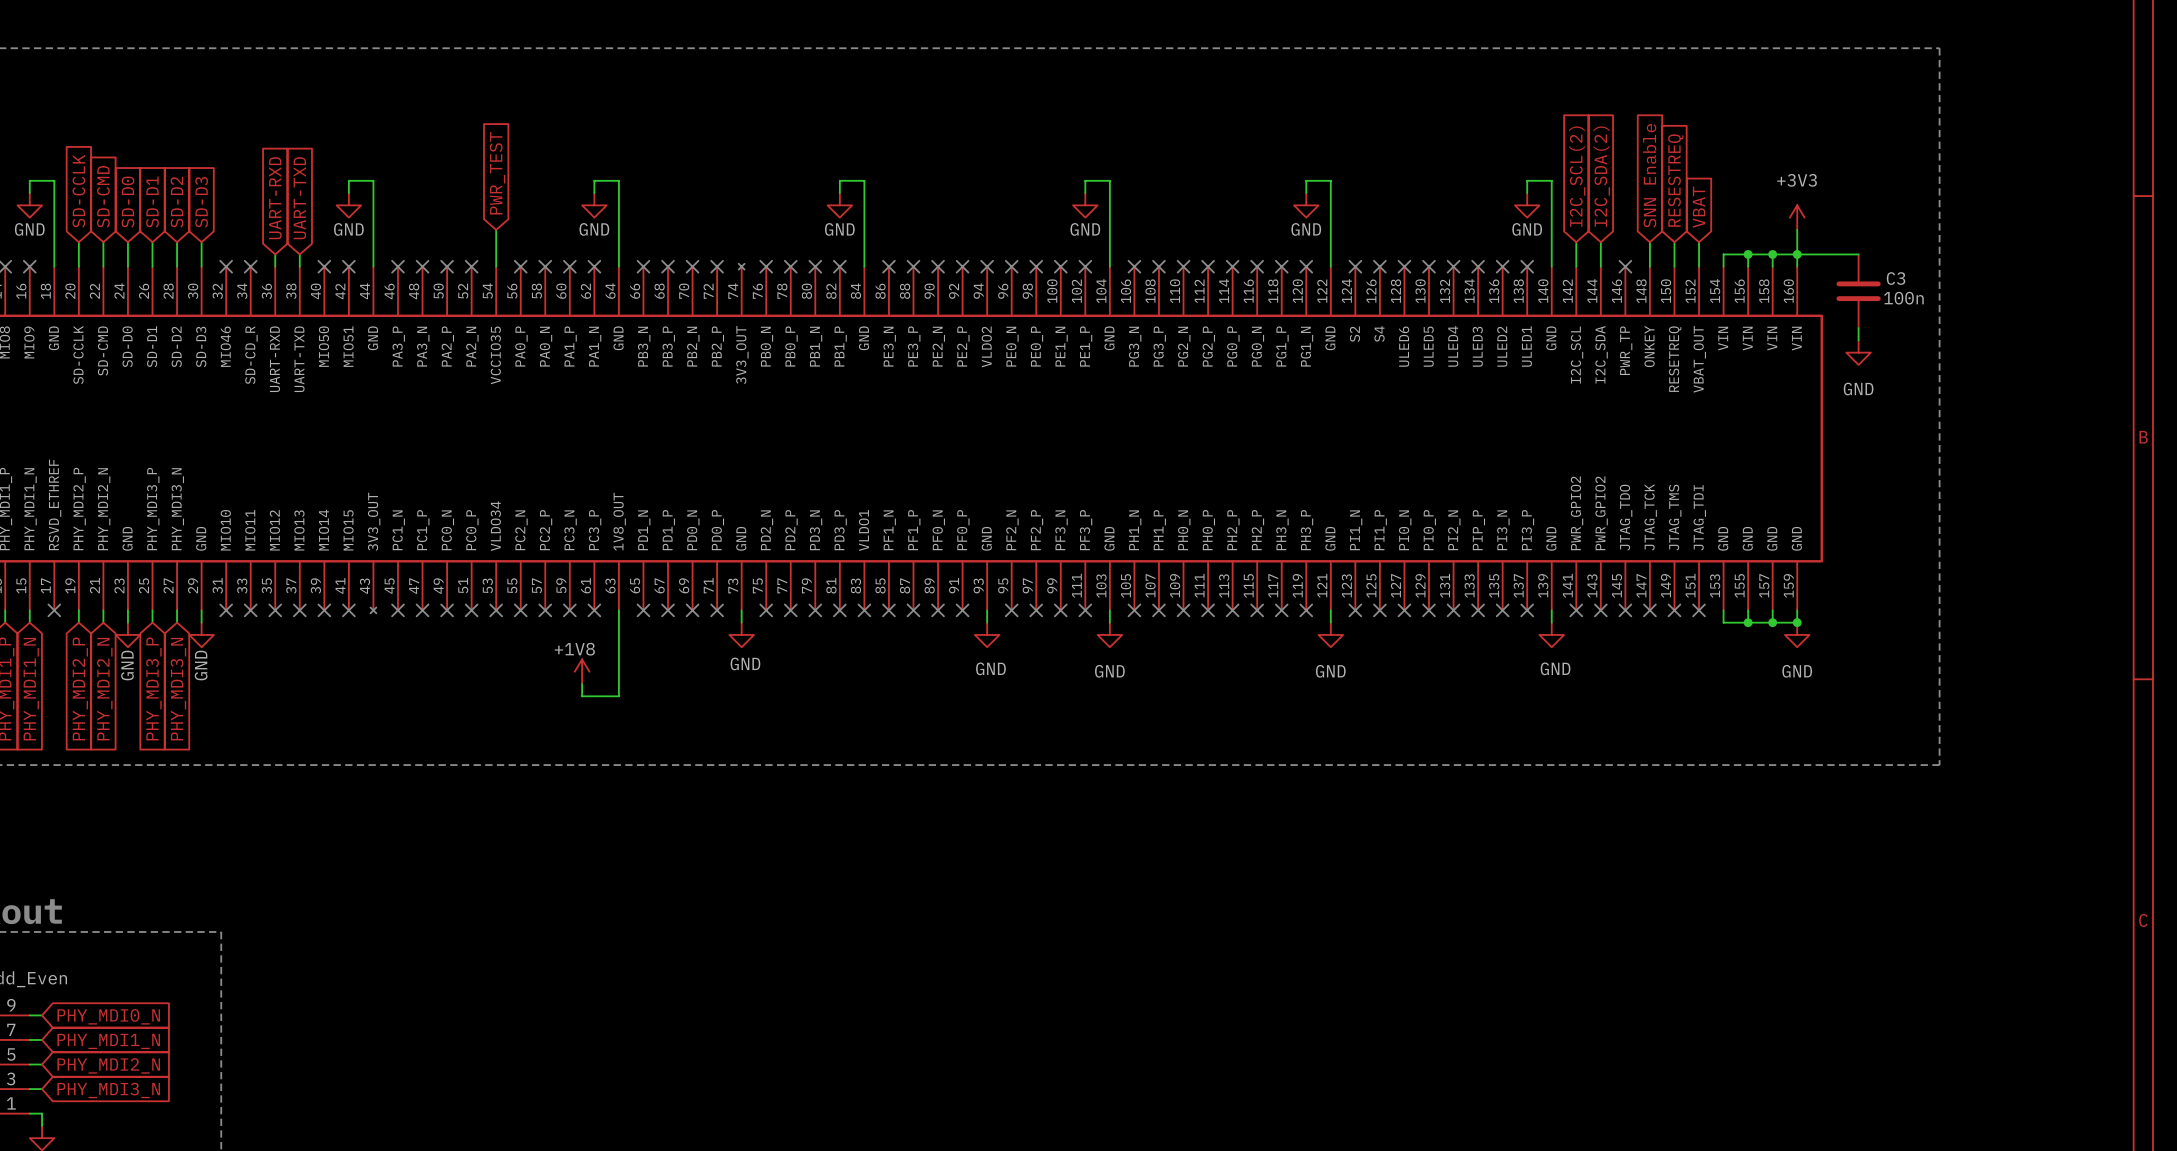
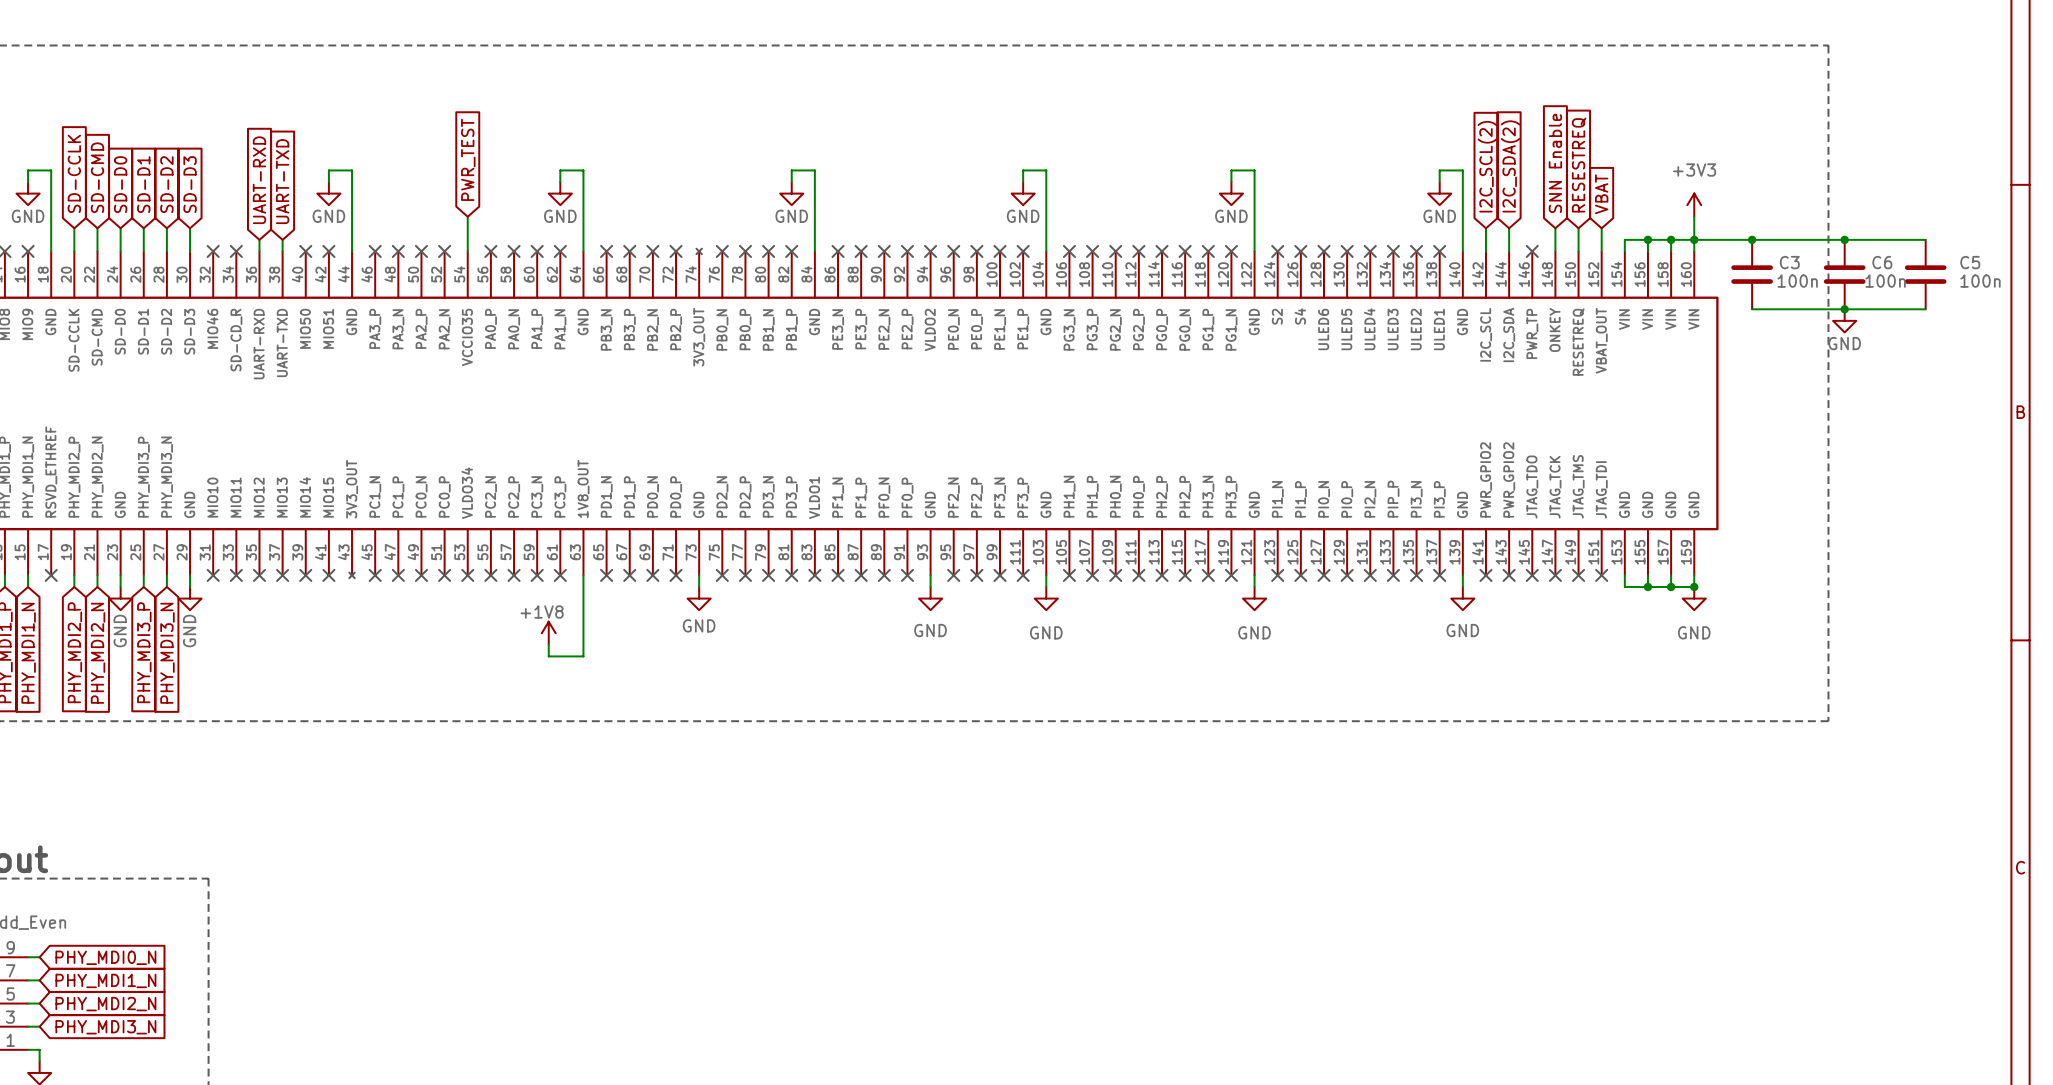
wire: none -> (1752, 239) (1925, 239)
junction: none -> (1752, 239)
junction: none -> (1844, 239)
C6: none -> 100n (1844, 274)
C5: none -> 100n (1925, 274)
wire: (1858, 328) (1858, 340) -> (1752, 309) (1925, 309)
junction: none -> (1844, 309)
power symbol position: GND (1858, 352) -> GND (1844, 320)
power symbol text position: GND (1858, 389) -> GND (1844, 343)

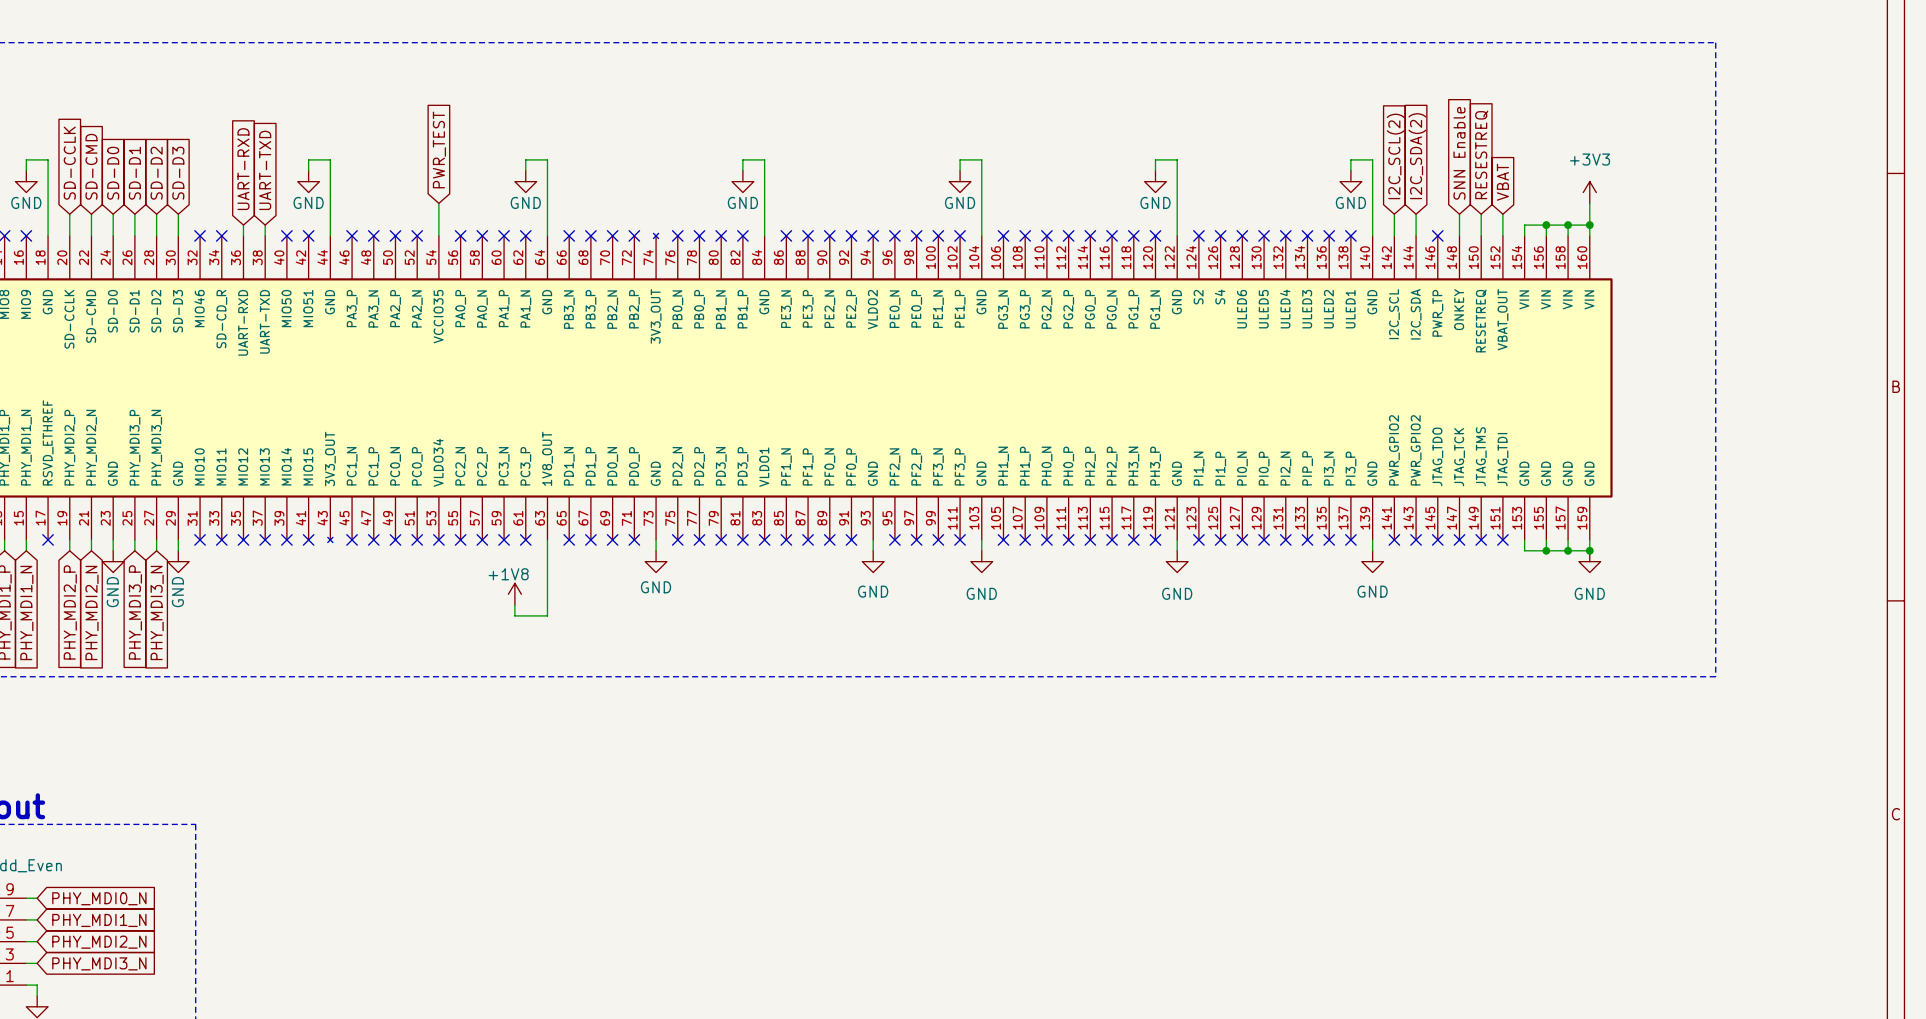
wire: (1694, 239) (1925, 239) -> none
junction: (1752, 239) -> none
junction: (1844, 239) -> none
C3: 100n (1752, 274) -> none
C6: 100n (1844, 274) -> none
C5: 100n (1925, 274) -> none
wire: (1752, 309) (1925, 309) -> none
junction: (1844, 309) -> none
power symbol: GND (1844, 320) -> none

